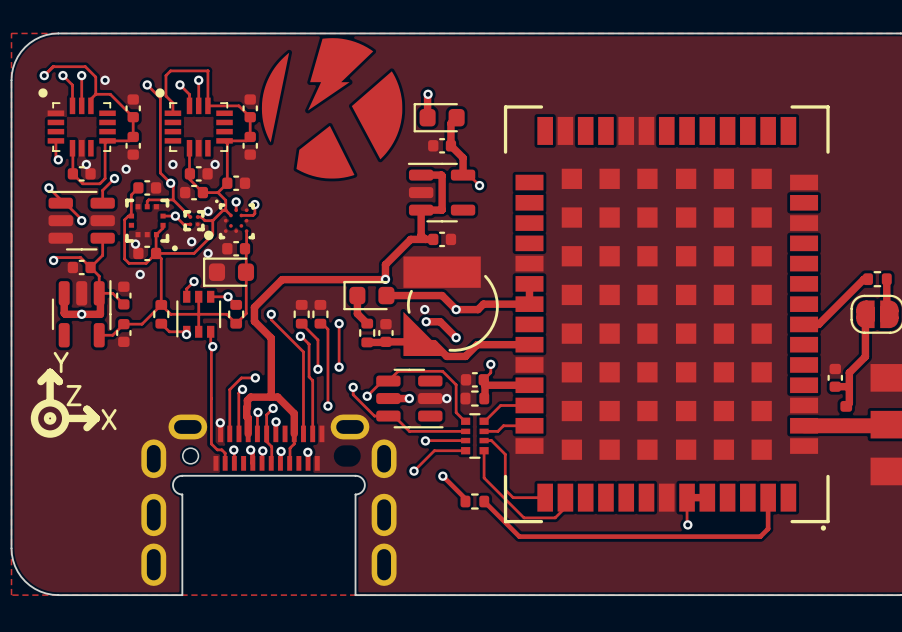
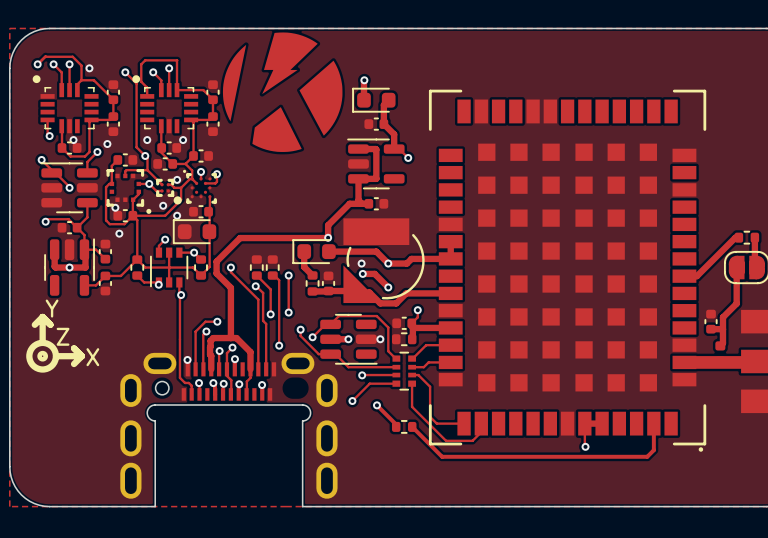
part footprint: [141, 414, 397, 586] -> [120, 352, 338, 499]

